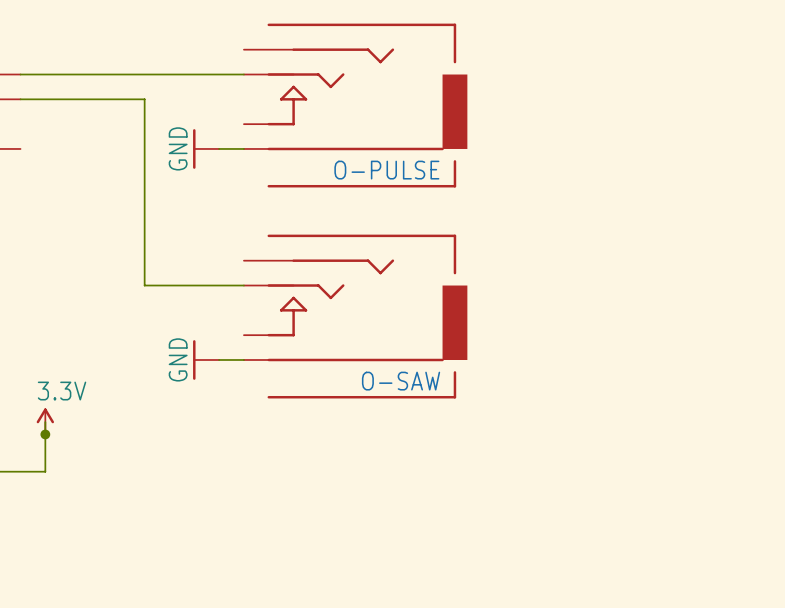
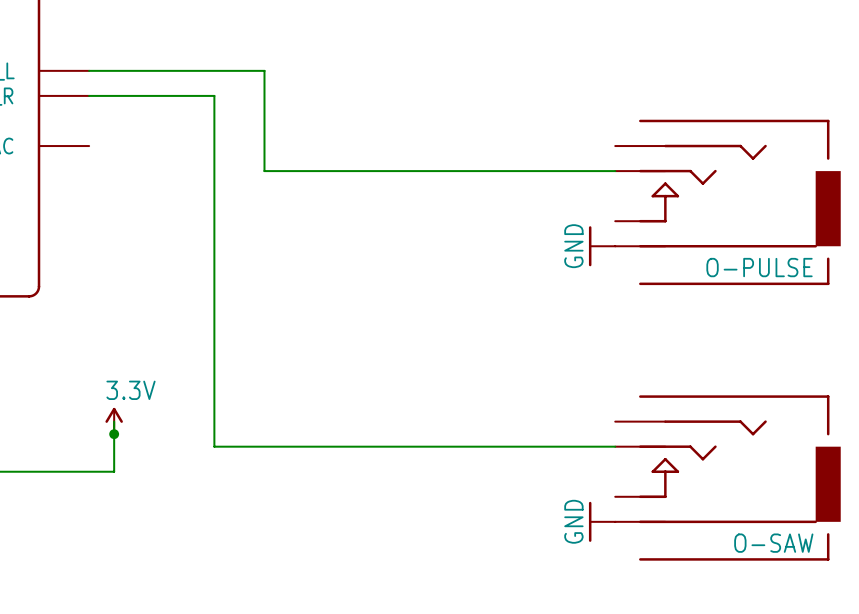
wire: (194, 74) (243, 74) -> (264, 70) (264, 171) (615, 171)
O-PULSE: (355, 105) -> none
power symbol: GND (206, 148) -> none
wire: (219, 148) (243, 148) -> none
O-PULSE: none -> (727, 202)
power symbol: none -> GND (602, 246)
wire: (144, 285) (243, 285) -> (214, 283) (214, 446) (615, 446)
O-SAW: (355, 316) -> none
power symbol: GND (206, 359) -> none
wire: (219, 359) (243, 359) -> none
O-SAW: none -> (727, 478)
power symbol: none -> GND (602, 521)

